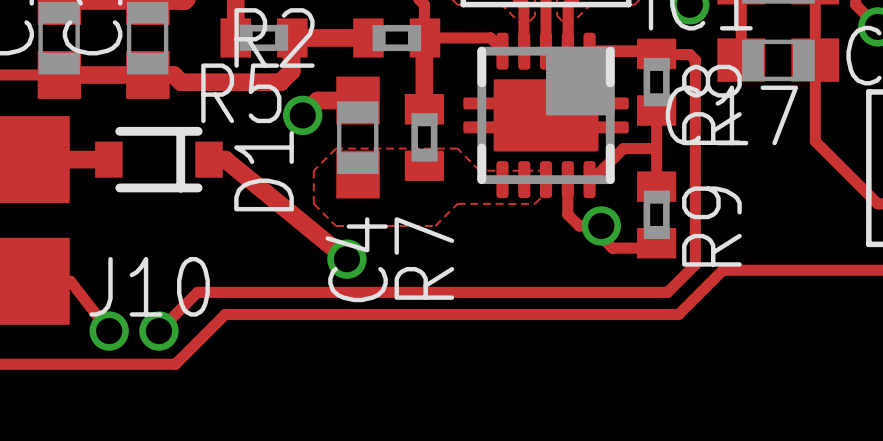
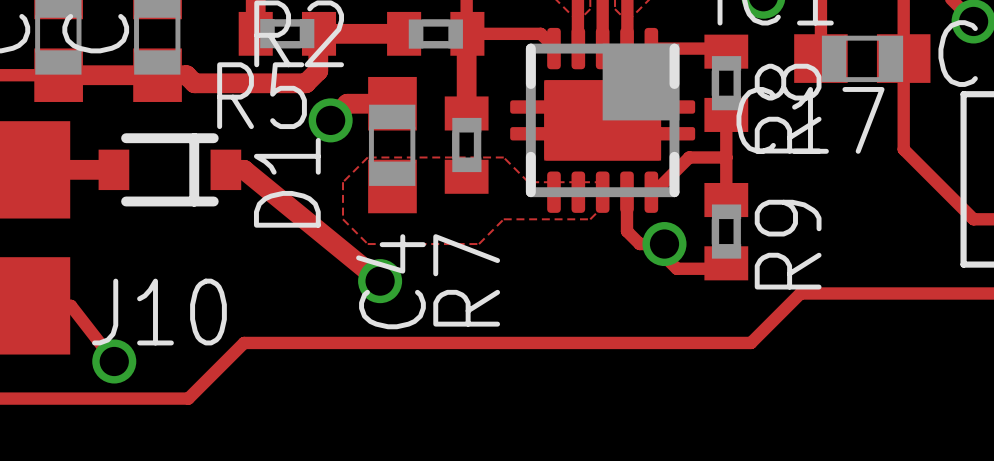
track: (653, 51) (656, 54) (689, 54) (695, 60) (695, 264) (667, 292) (197, 292) (158, 331) -> none
via: (158, 331) -> none

